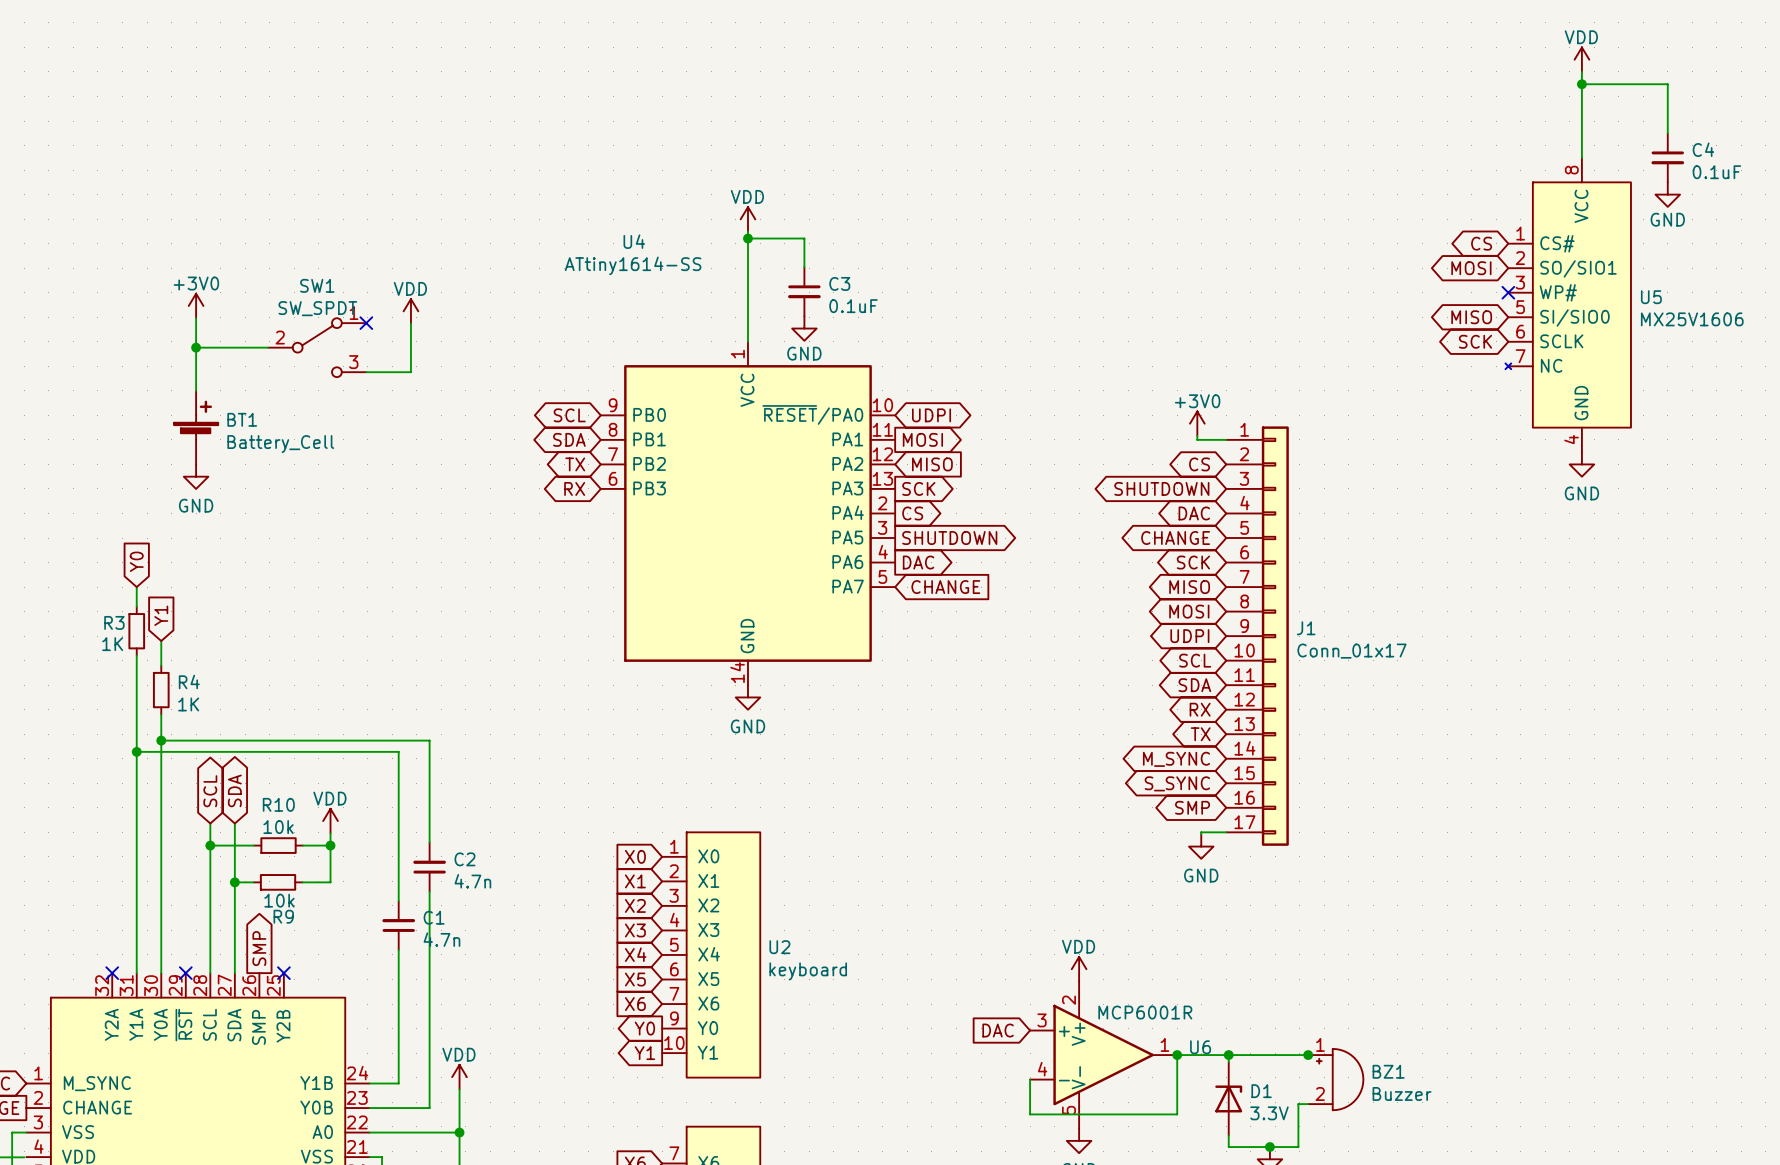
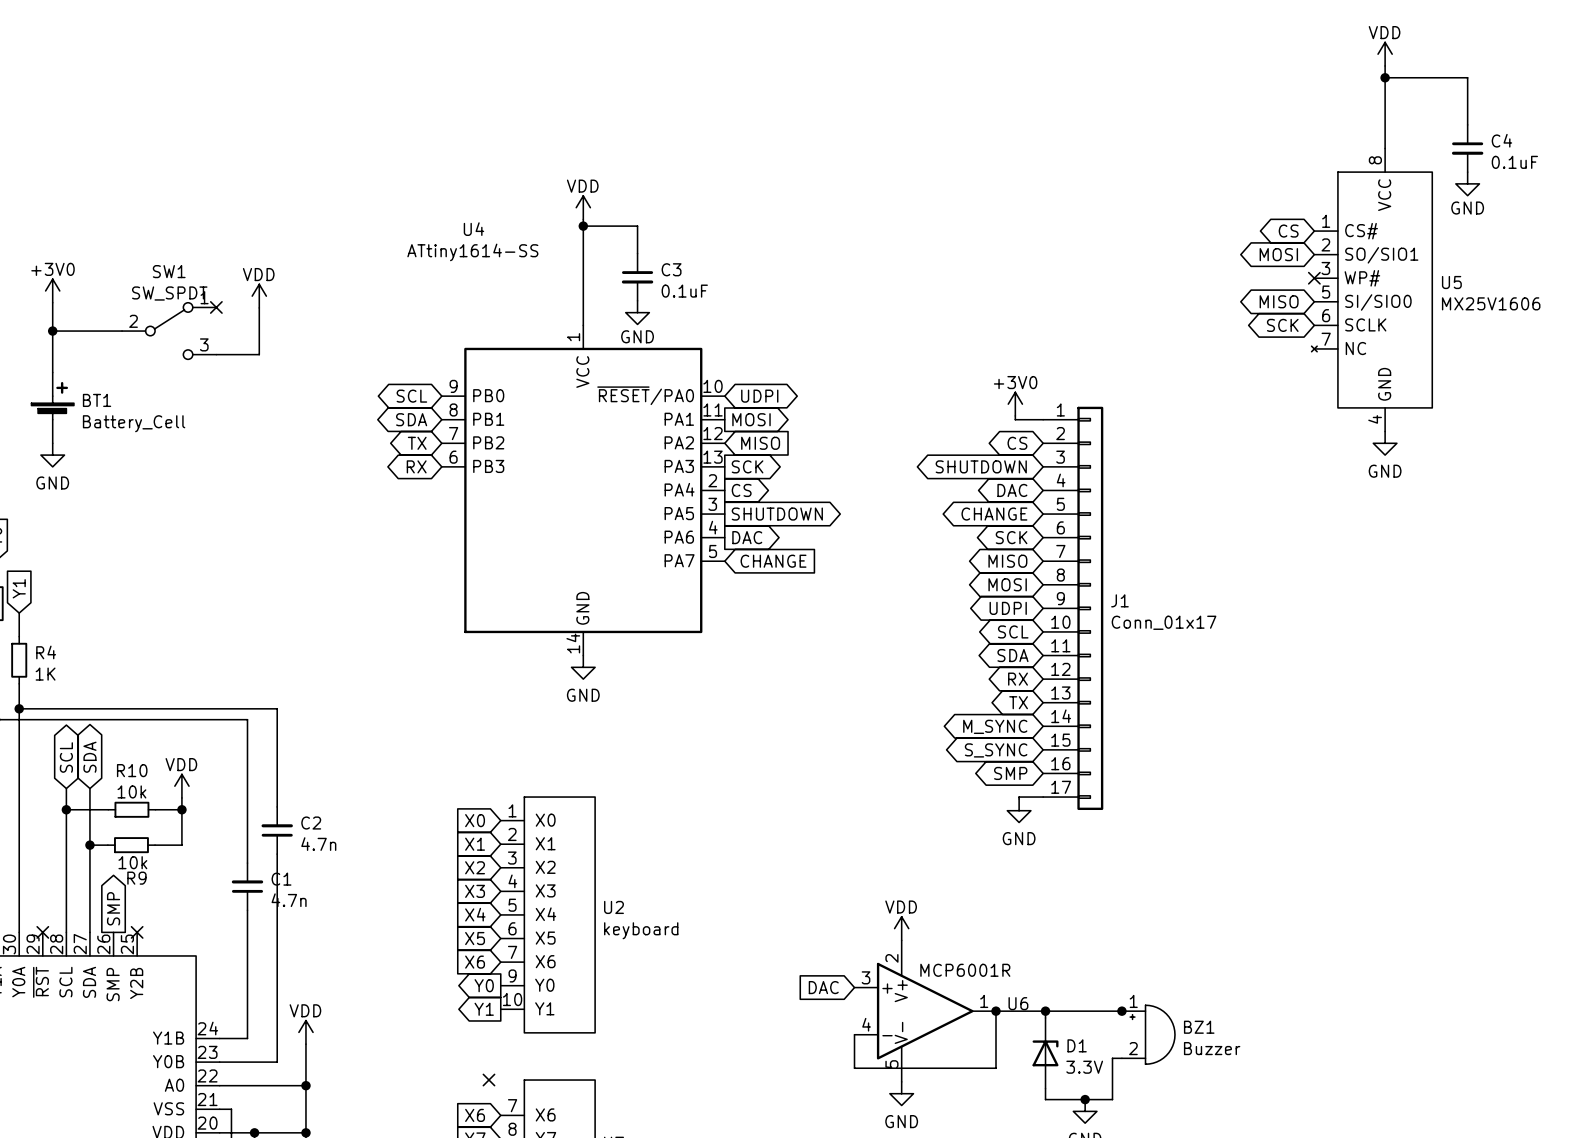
no-connect mark: none -> (488, 1080)

